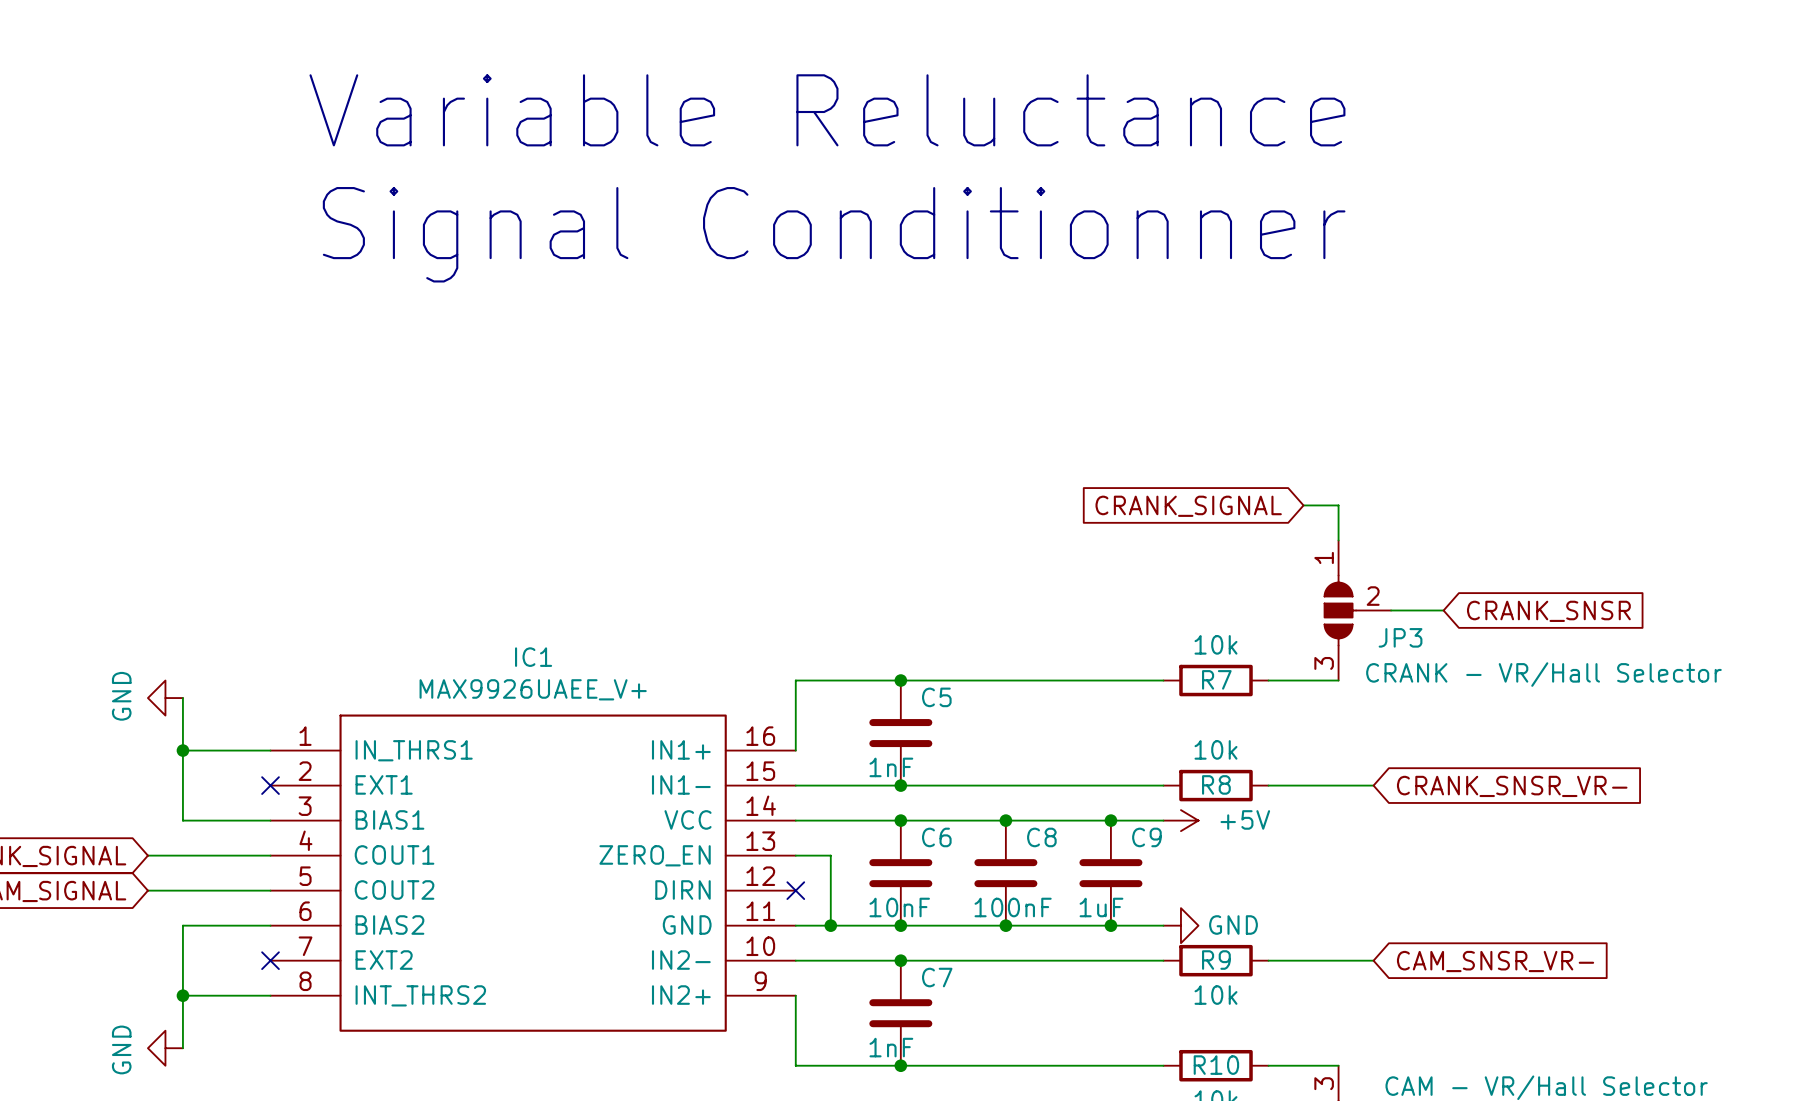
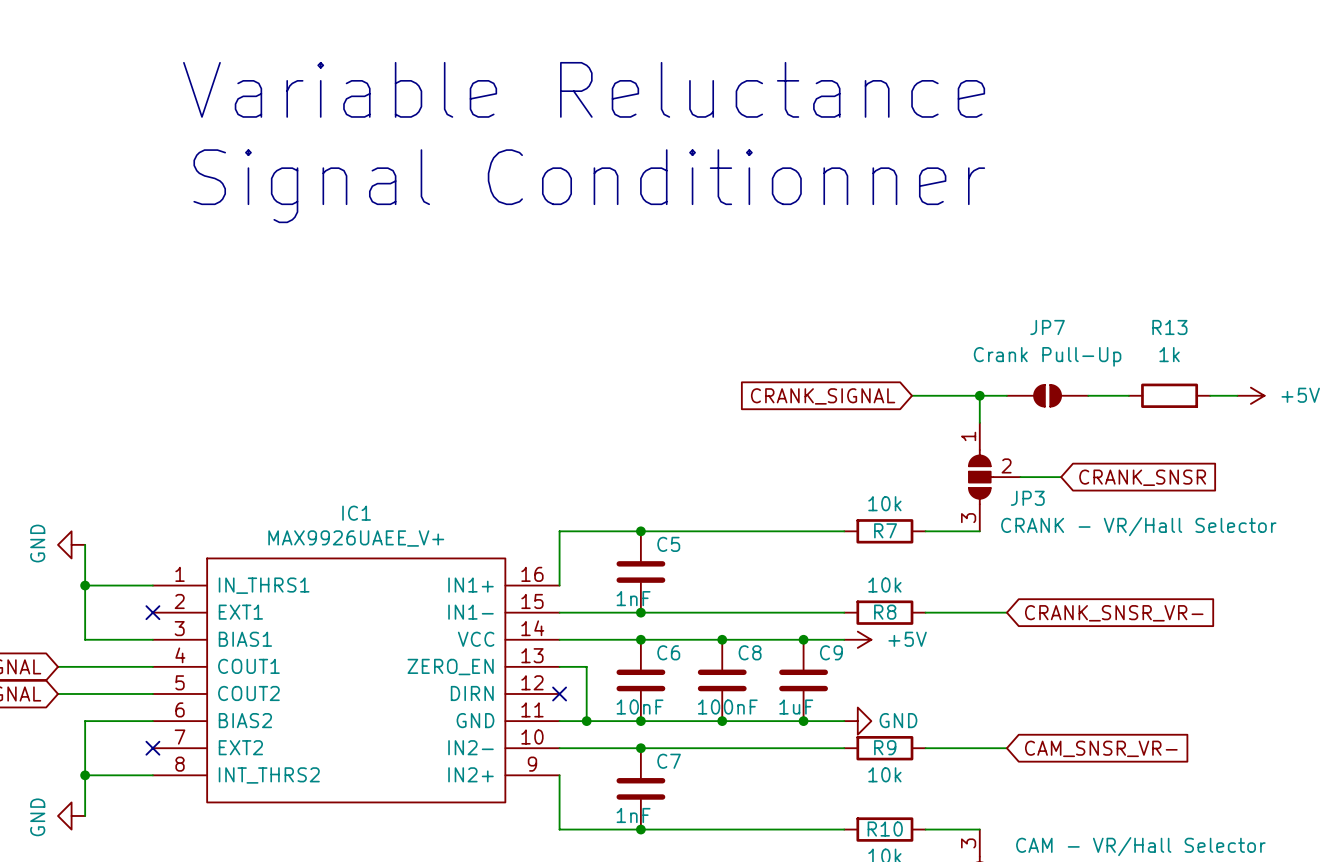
wire: none -> (912, 395) (952, 395)
wire: none -> (979, 395) (1006, 395)
junction: none -> (979, 395)
JP7: none -> Crank Pull-Up (1047, 395)
wire: none -> (1088, 395) (1128, 395)
R13: none -> 1k (1169, 395)
wire: none -> (1210, 395) (1237, 395)
power symbol: none -> +5V (1250, 395)
global label position: CRANK_SIGNAL (1188, 506) -> CRANK_SIGNAL (823, 396)

